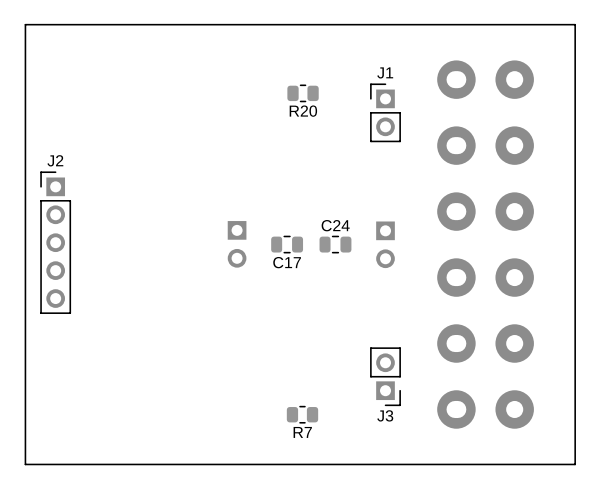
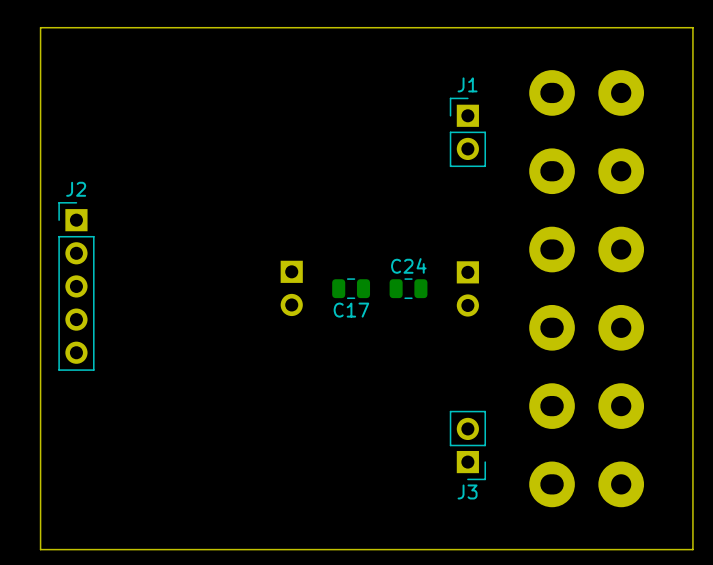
R20: (303, 93) -> none
R7: (302, 414) -> none

